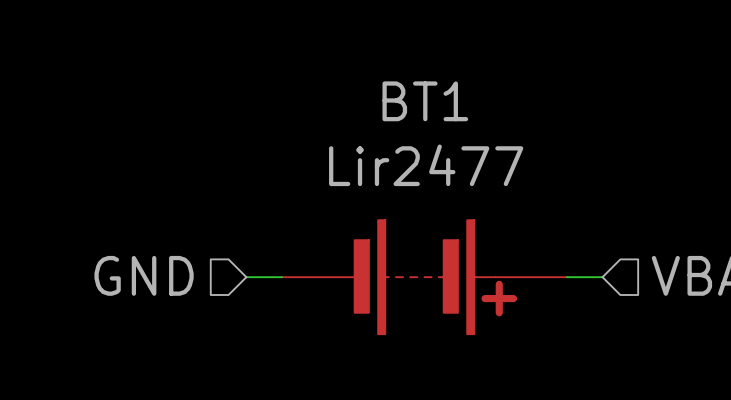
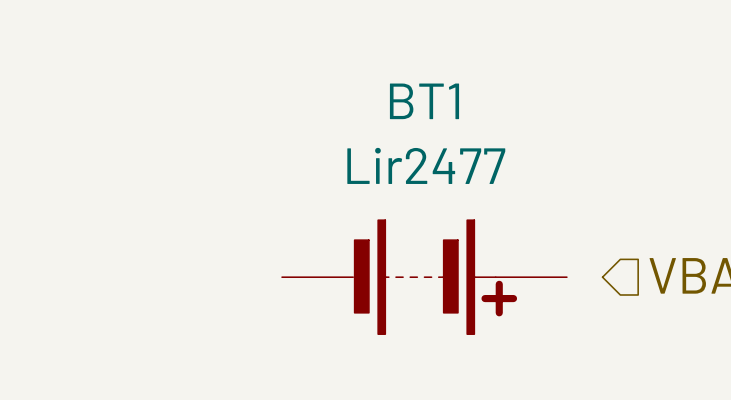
hierarchical label: GND (144, 275) -> none
wire: (246, 277) (282, 277) -> none
wire: (566, 277) (602, 277) -> none

